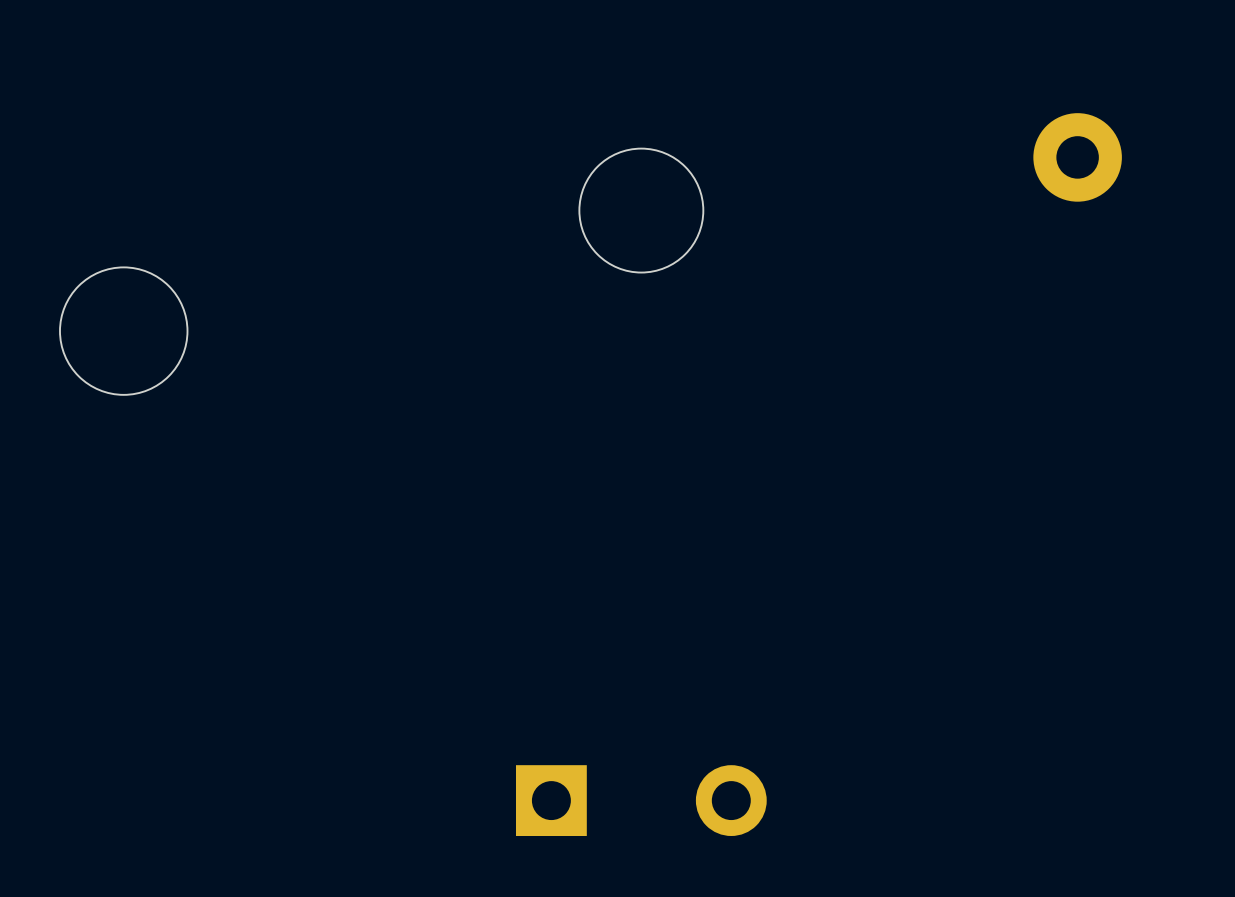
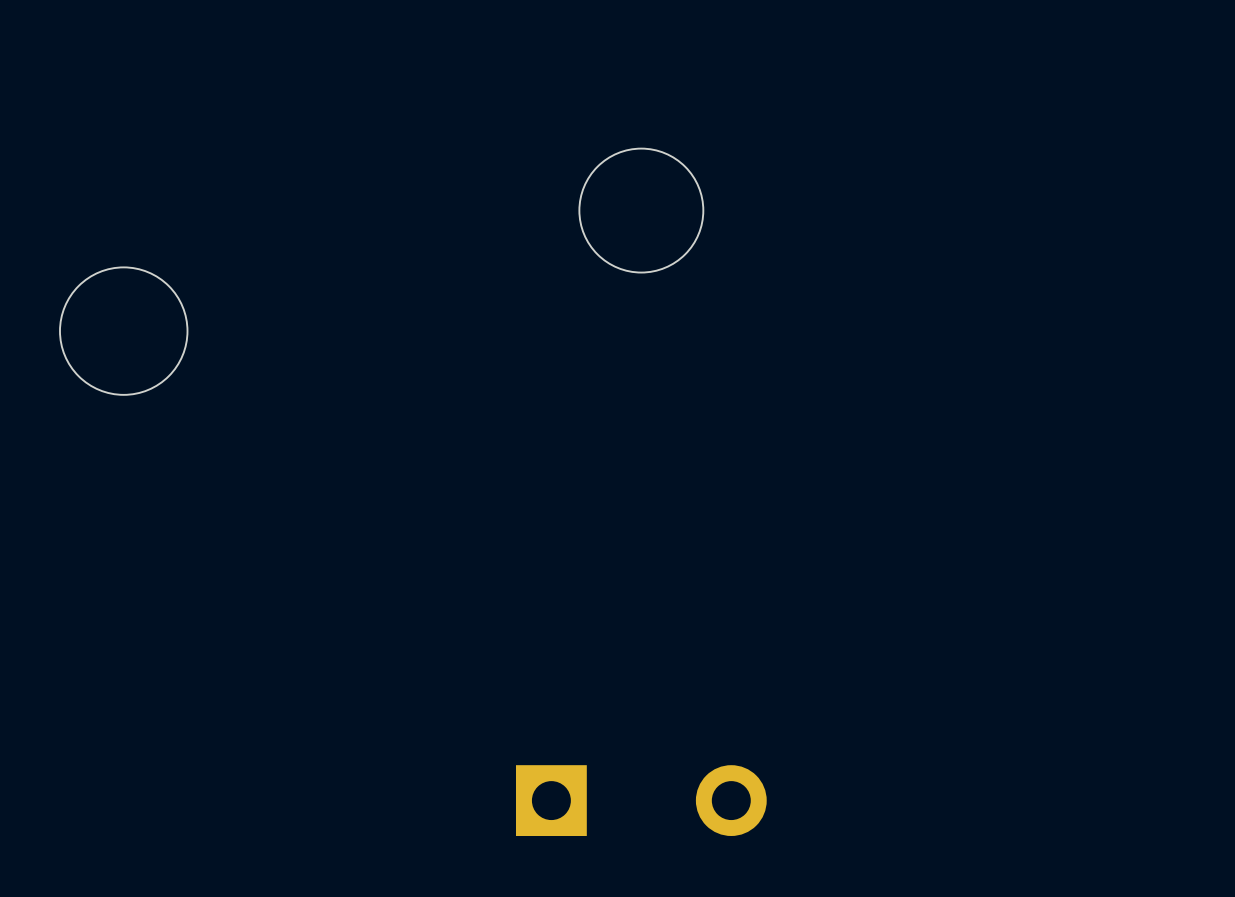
part: (1077, 157) -> none

